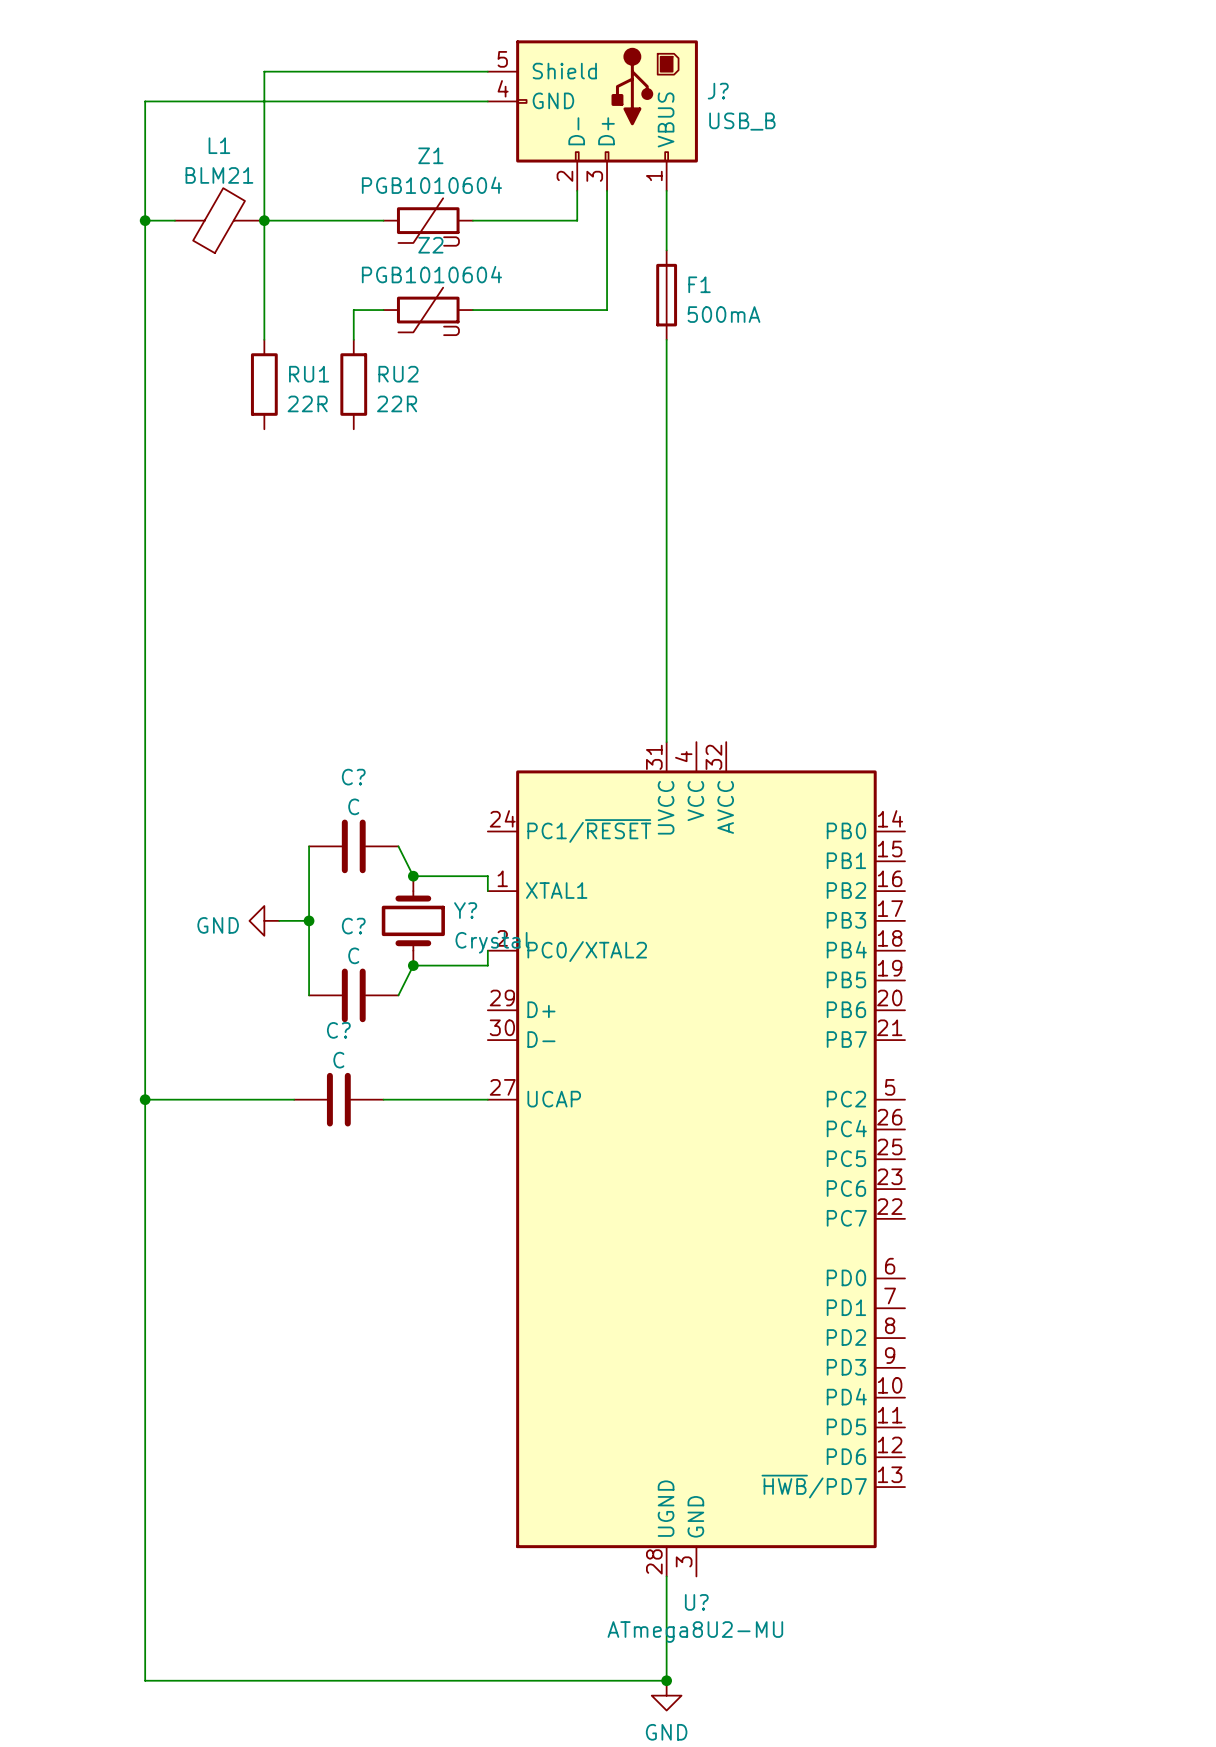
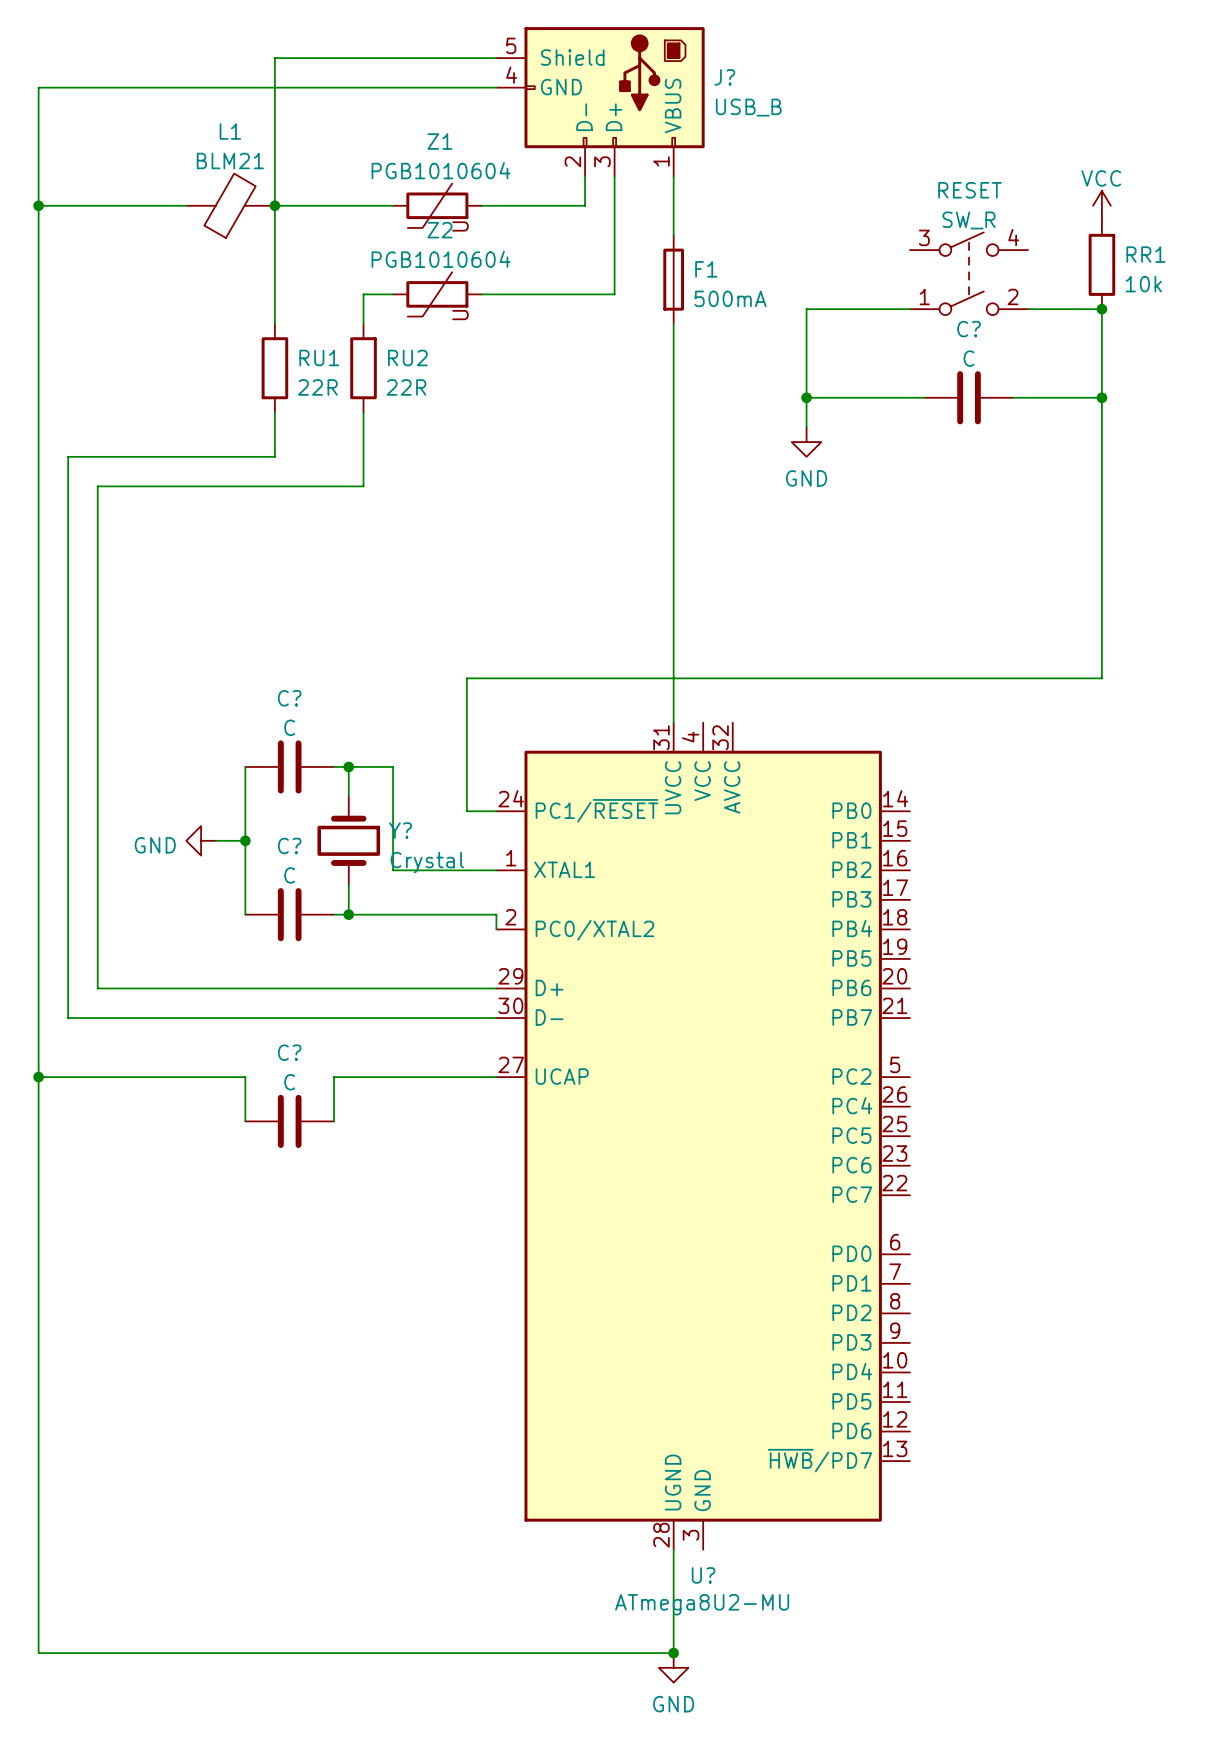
wire: (145, 101) (145, 1680) -> (156, 87) (38, 87) (38, 1653) (156, 1653)
wire: none -> (38, 205) (156, 205)
junction: none -> (38, 205)
junction: (145, 220) -> none
power symbol: none -> VCC (1101, 205)
RR1: none -> 10k (1101, 264)
RESET: none -> SW_R (969, 273)
wire: none -> (909, 309) (806, 309) (806, 427)
wire: none -> (1028, 309) (1101, 309) (1101, 678) (466, 678) (466, 811) (496, 811)
junction: none -> (1101, 309)
wire: none -> (806, 397) (924, 397)
junction: none -> (806, 397)
C?: none -> C (969, 397)
wire: none -> (1013, 397) (1101, 397)
junction: none -> (1101, 397)
wire: none -> (274, 412) (274, 456) (68, 456) (68, 1018) (496, 1018)
wire: none -> (363, 412) (363, 486) (97, 486) (97, 988) (496, 988)
power symbol: none -> GND (806, 442)
C?: none -> C (289, 766)
wire: none -> (348, 766) (348, 796)
junction: none -> (348, 766)
wire: (309, 846) (309, 995) -> (245, 766) (245, 914)
C?: C (353, 846) -> none
wire: (398, 846) (413, 876) (487, 876) (487, 891) -> (333, 766) (393, 766) (393, 870) (496, 870)
junction: none -> (245, 840)
junction: (413, 876) -> none
wire: none -> (348, 885) (348, 914)
power symbol position: GND (264, 920) -> GND (201, 840)
wire: (279, 920) (309, 920) -> (215, 840) (245, 840)
junction position: (309, 920) -> (348, 914)
Y? position: (413, 920) -> (348, 840)
C?: none -> C (289, 914)
wire: (487, 950) (487, 965) (413, 965) (398, 995) -> (496, 929) (496, 914) (333, 914)
junction: (413, 965) -> none
C?: C (353, 995) -> none
wire: none -> (38, 1077) (156, 1077)
junction: none -> (38, 1077)
junction: (145, 1099) -> none
wire: (234, 1099) (294, 1099) -> (245, 1077) (245, 1121)
C? position: (338, 1099) -> (289, 1121)
wire: none -> (393, 1077) (333, 1077) (333, 1121)

